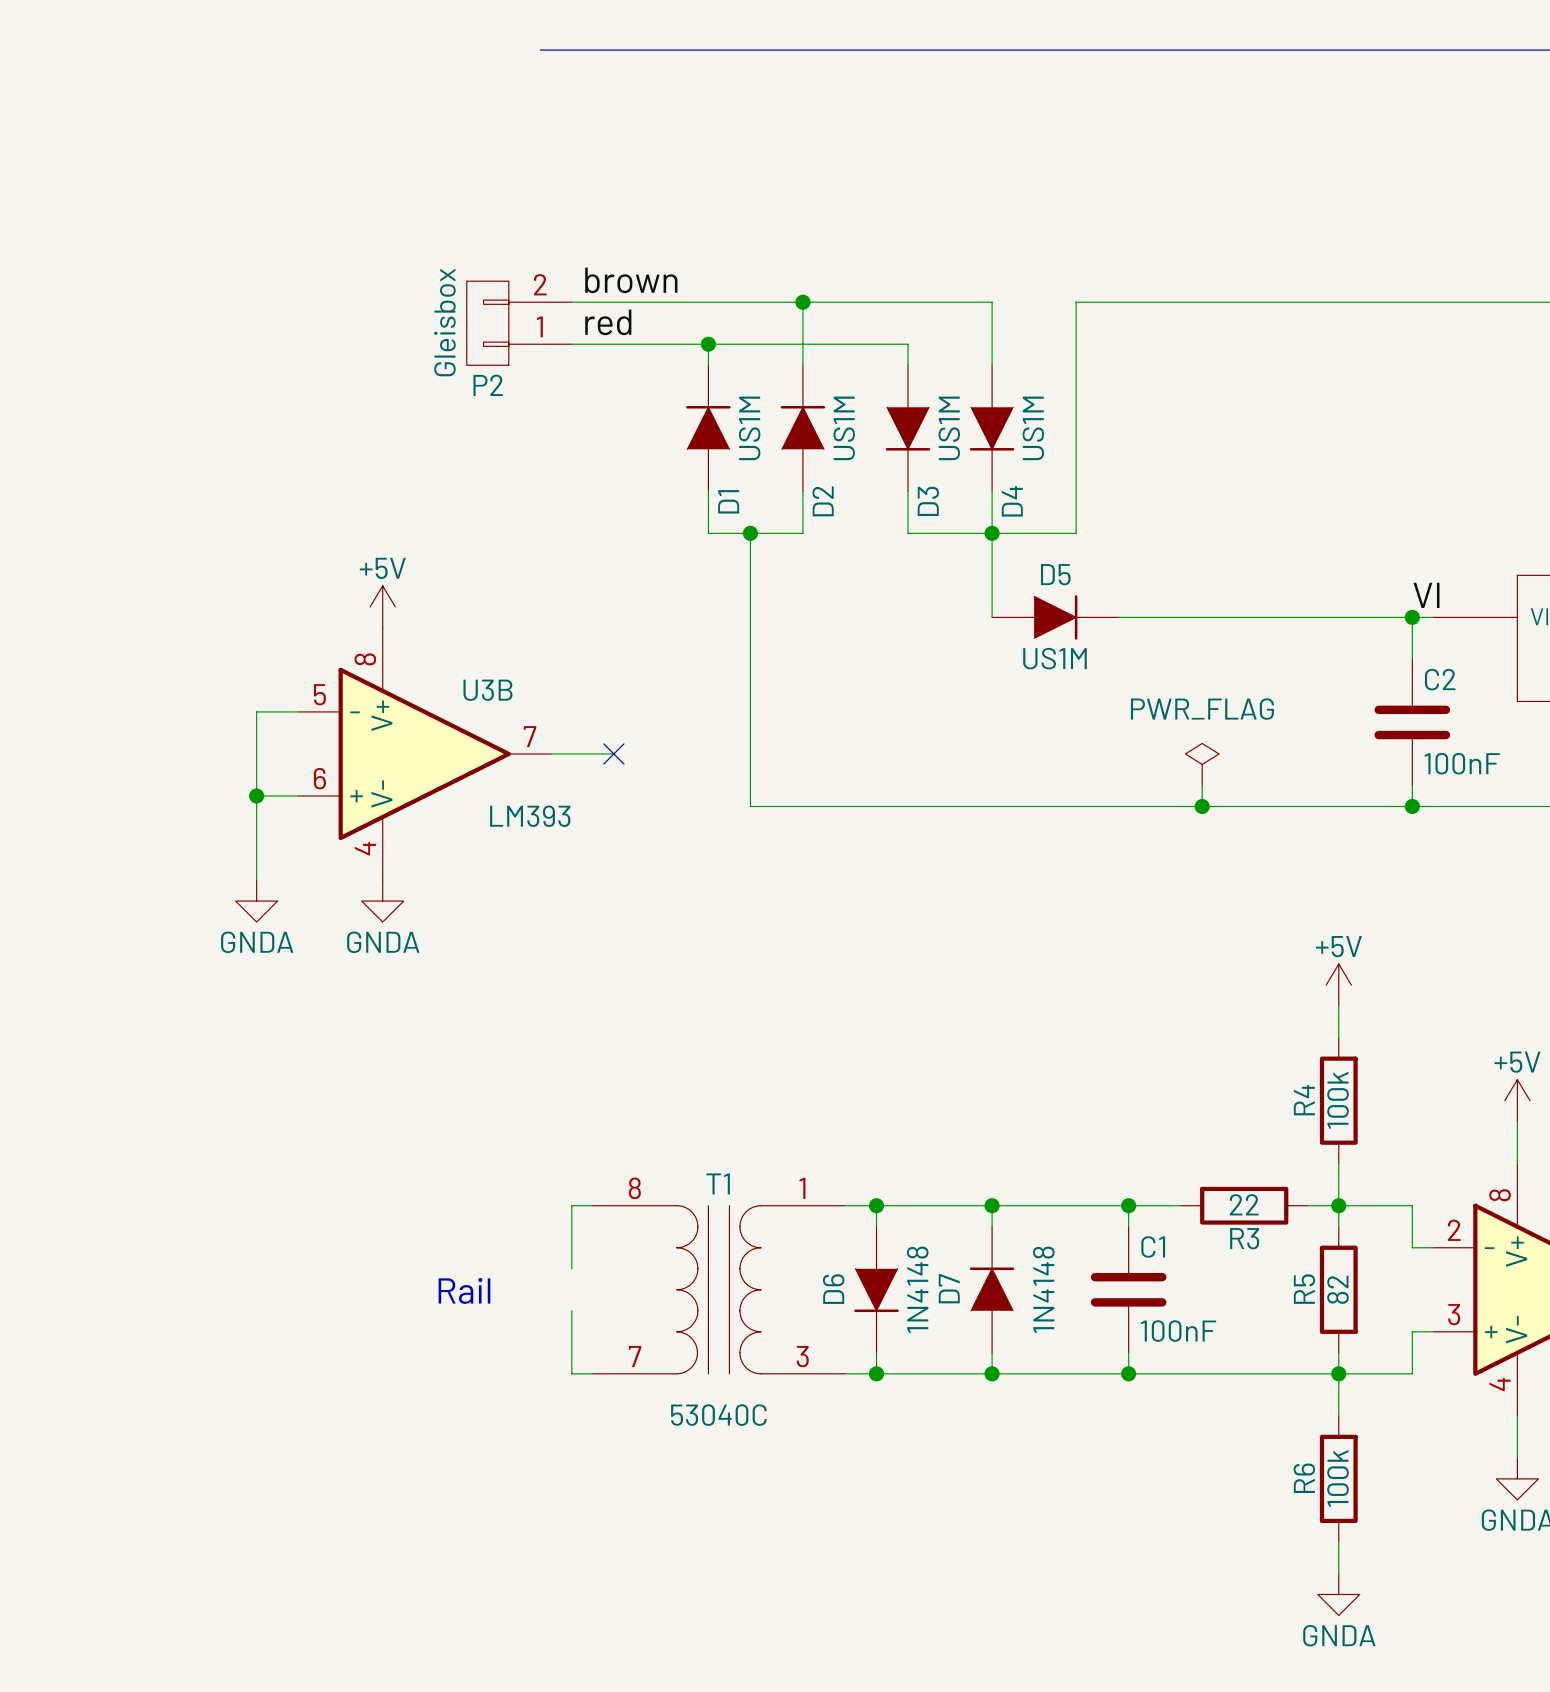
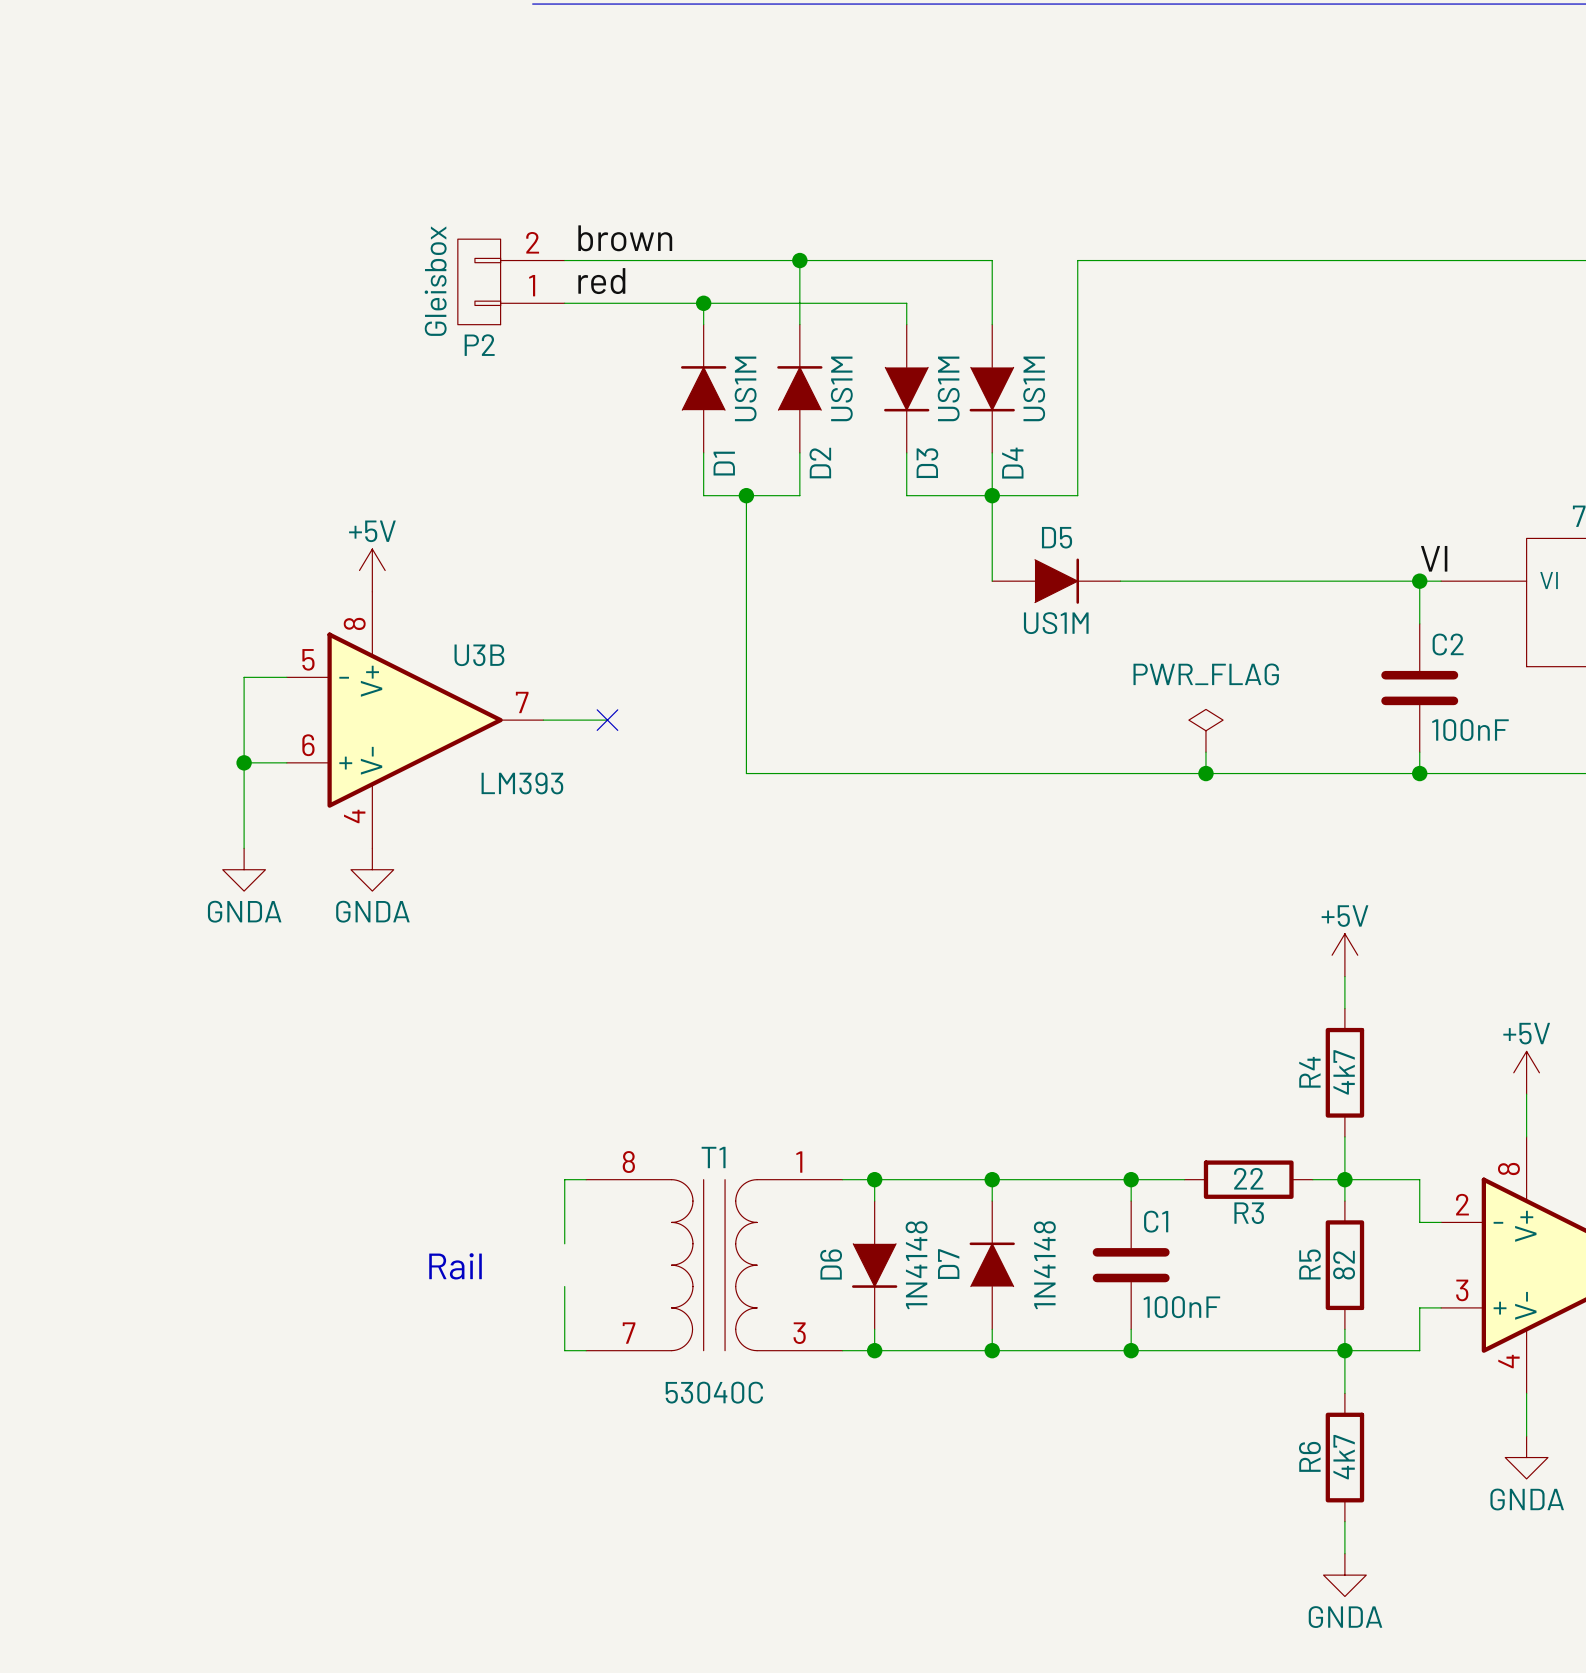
R4 value: 100k (1338, 1100) -> 4k7 (1344, 1072)
R6 value: 100k (1338, 1478) -> 4k7 (1344, 1457)

